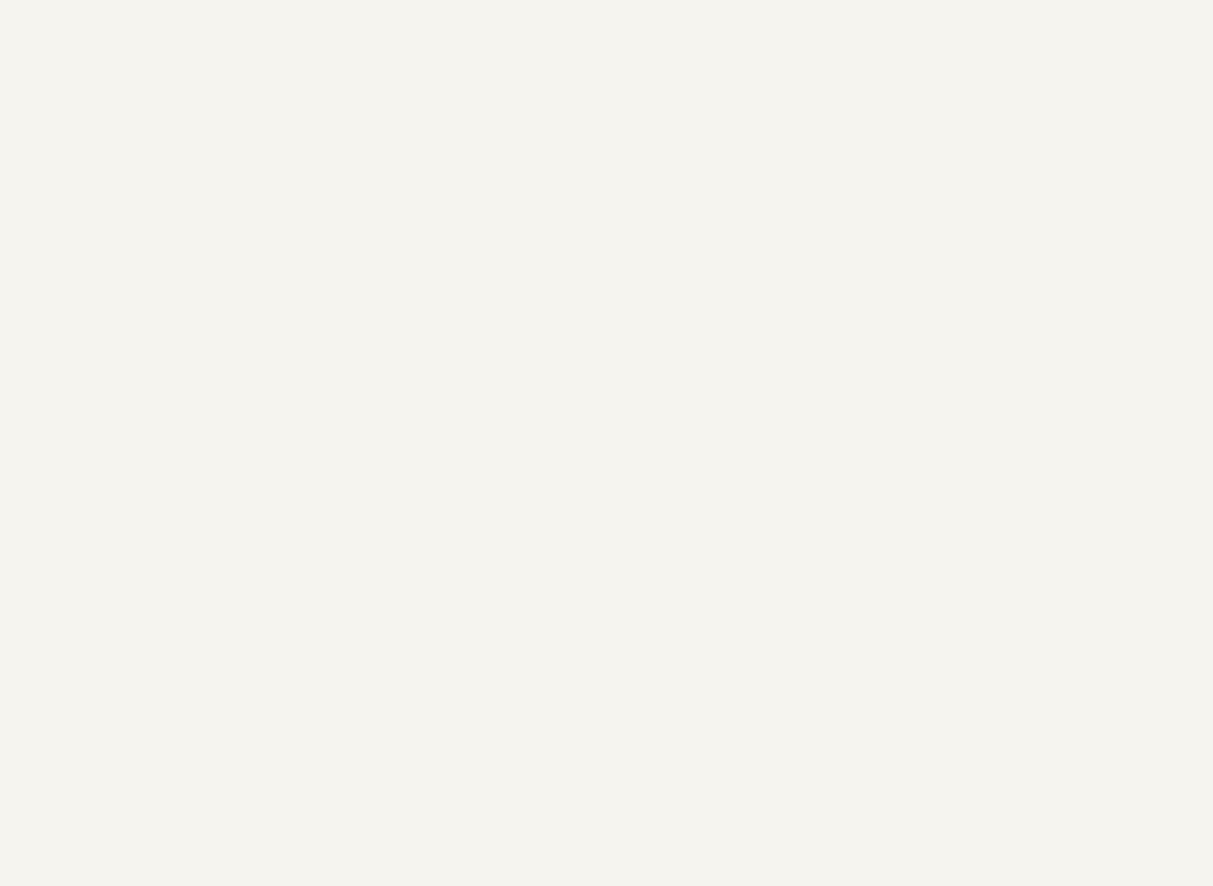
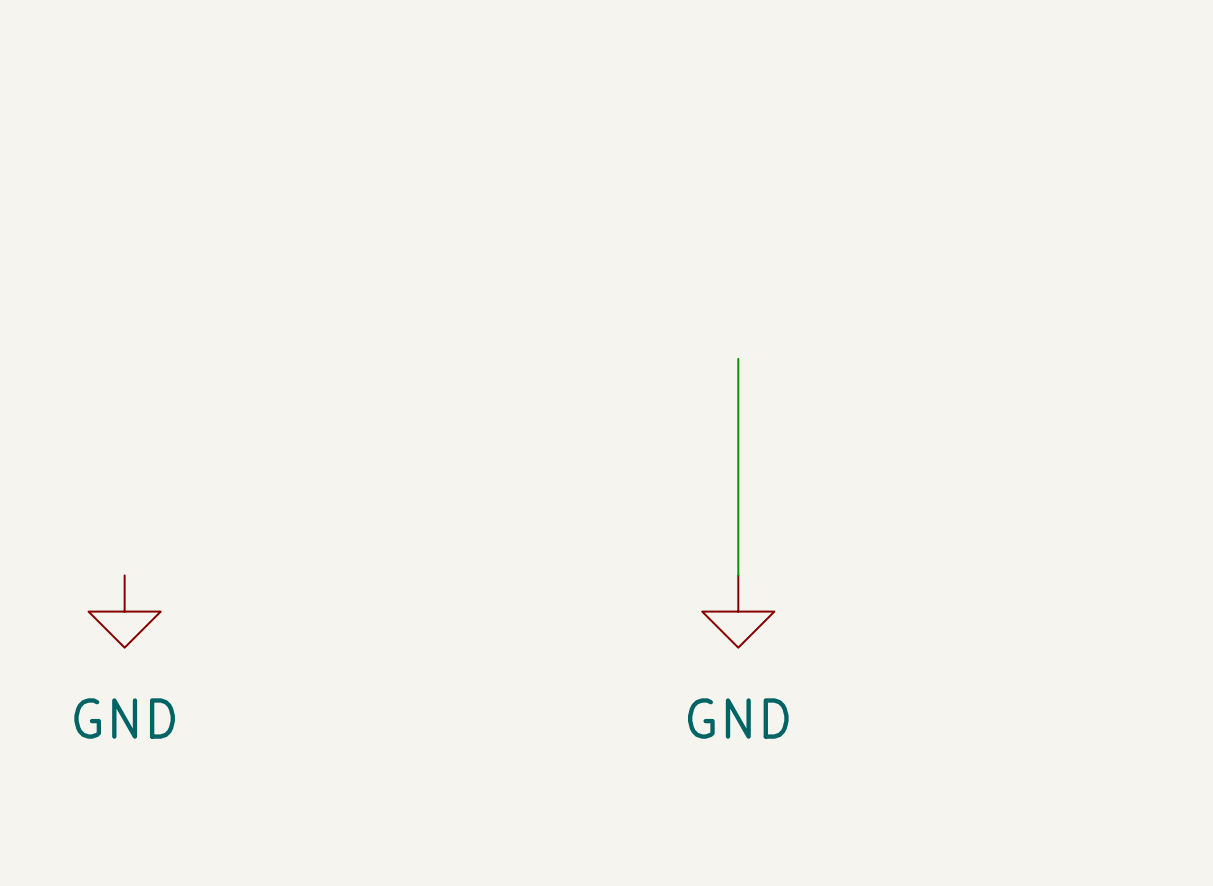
wire: none -> (738, 358) (738, 575)
power symbol: none -> GND (124, 611)
power symbol: none -> GND (738, 611)

